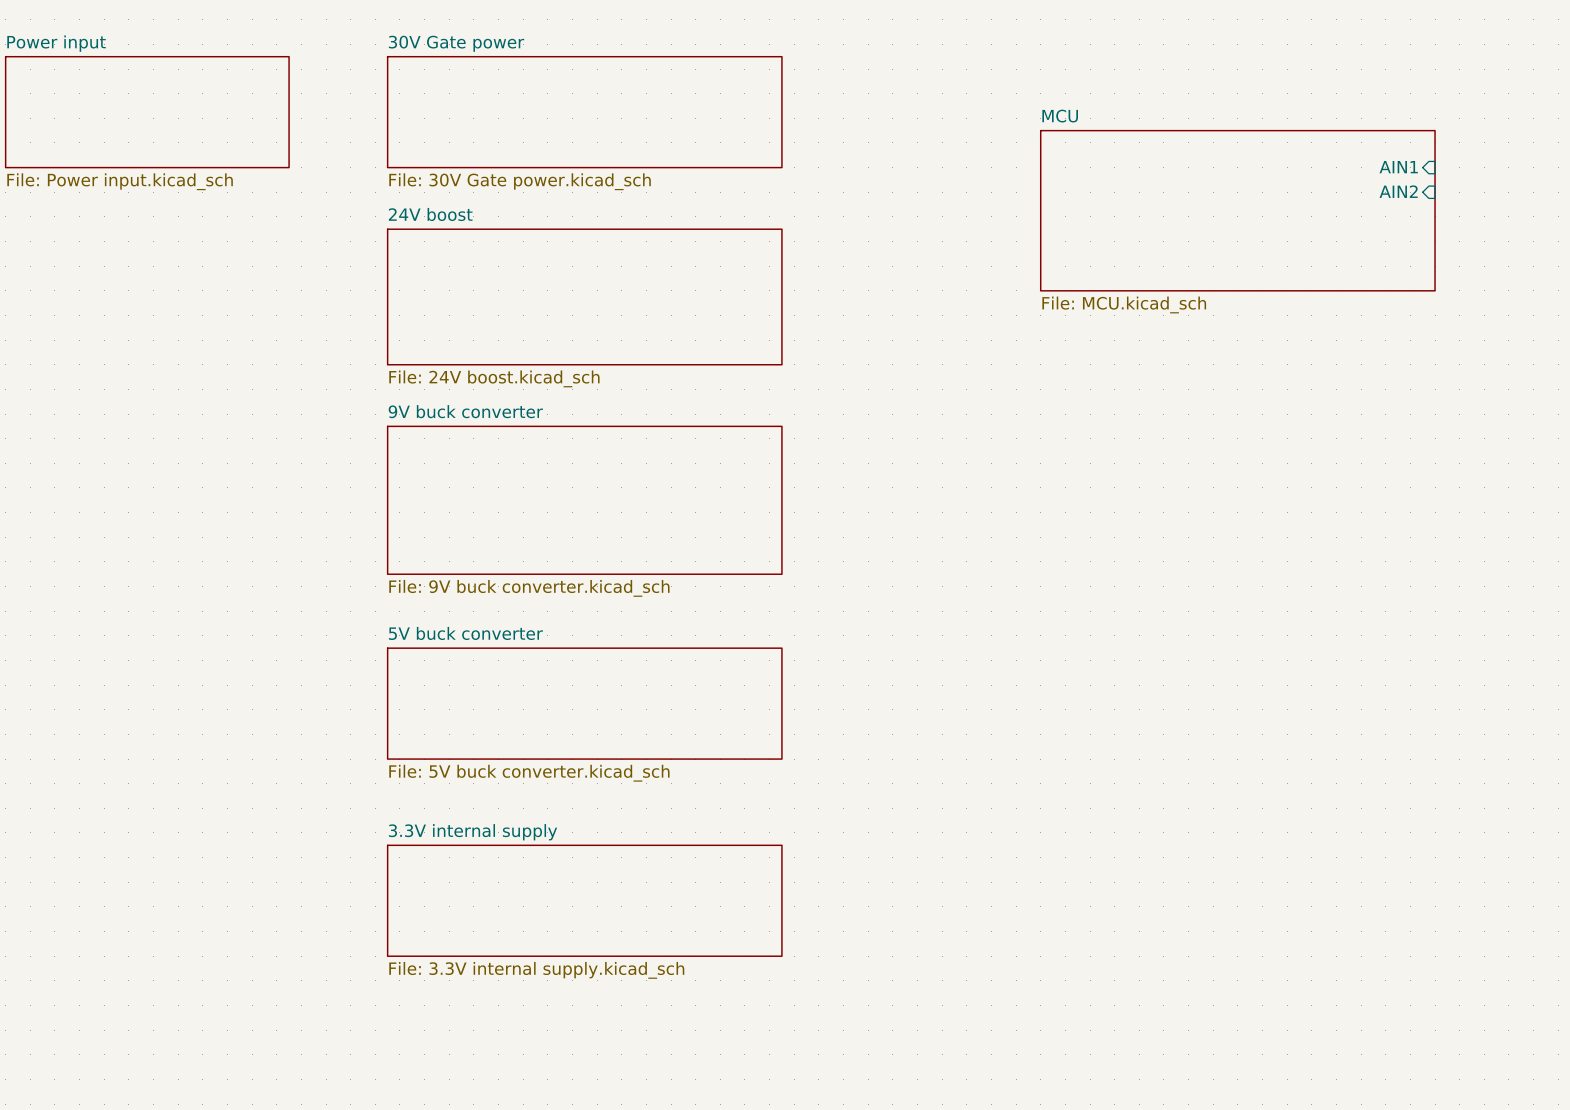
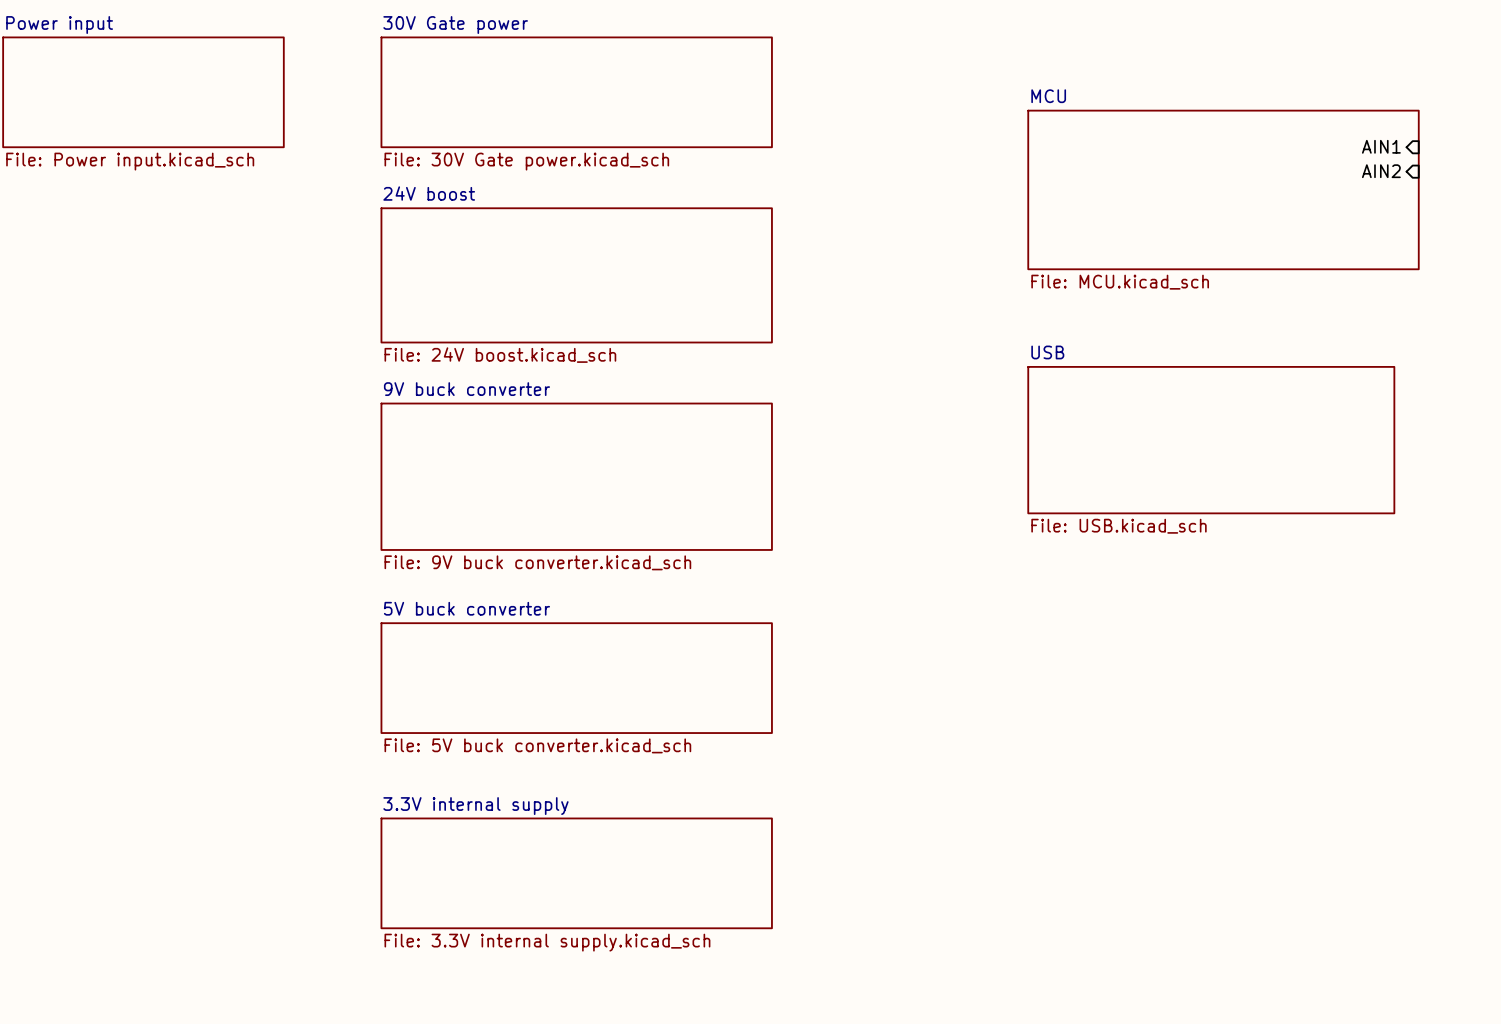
sheet USB: none -> File: USB.kicad_sch (1211, 440)

